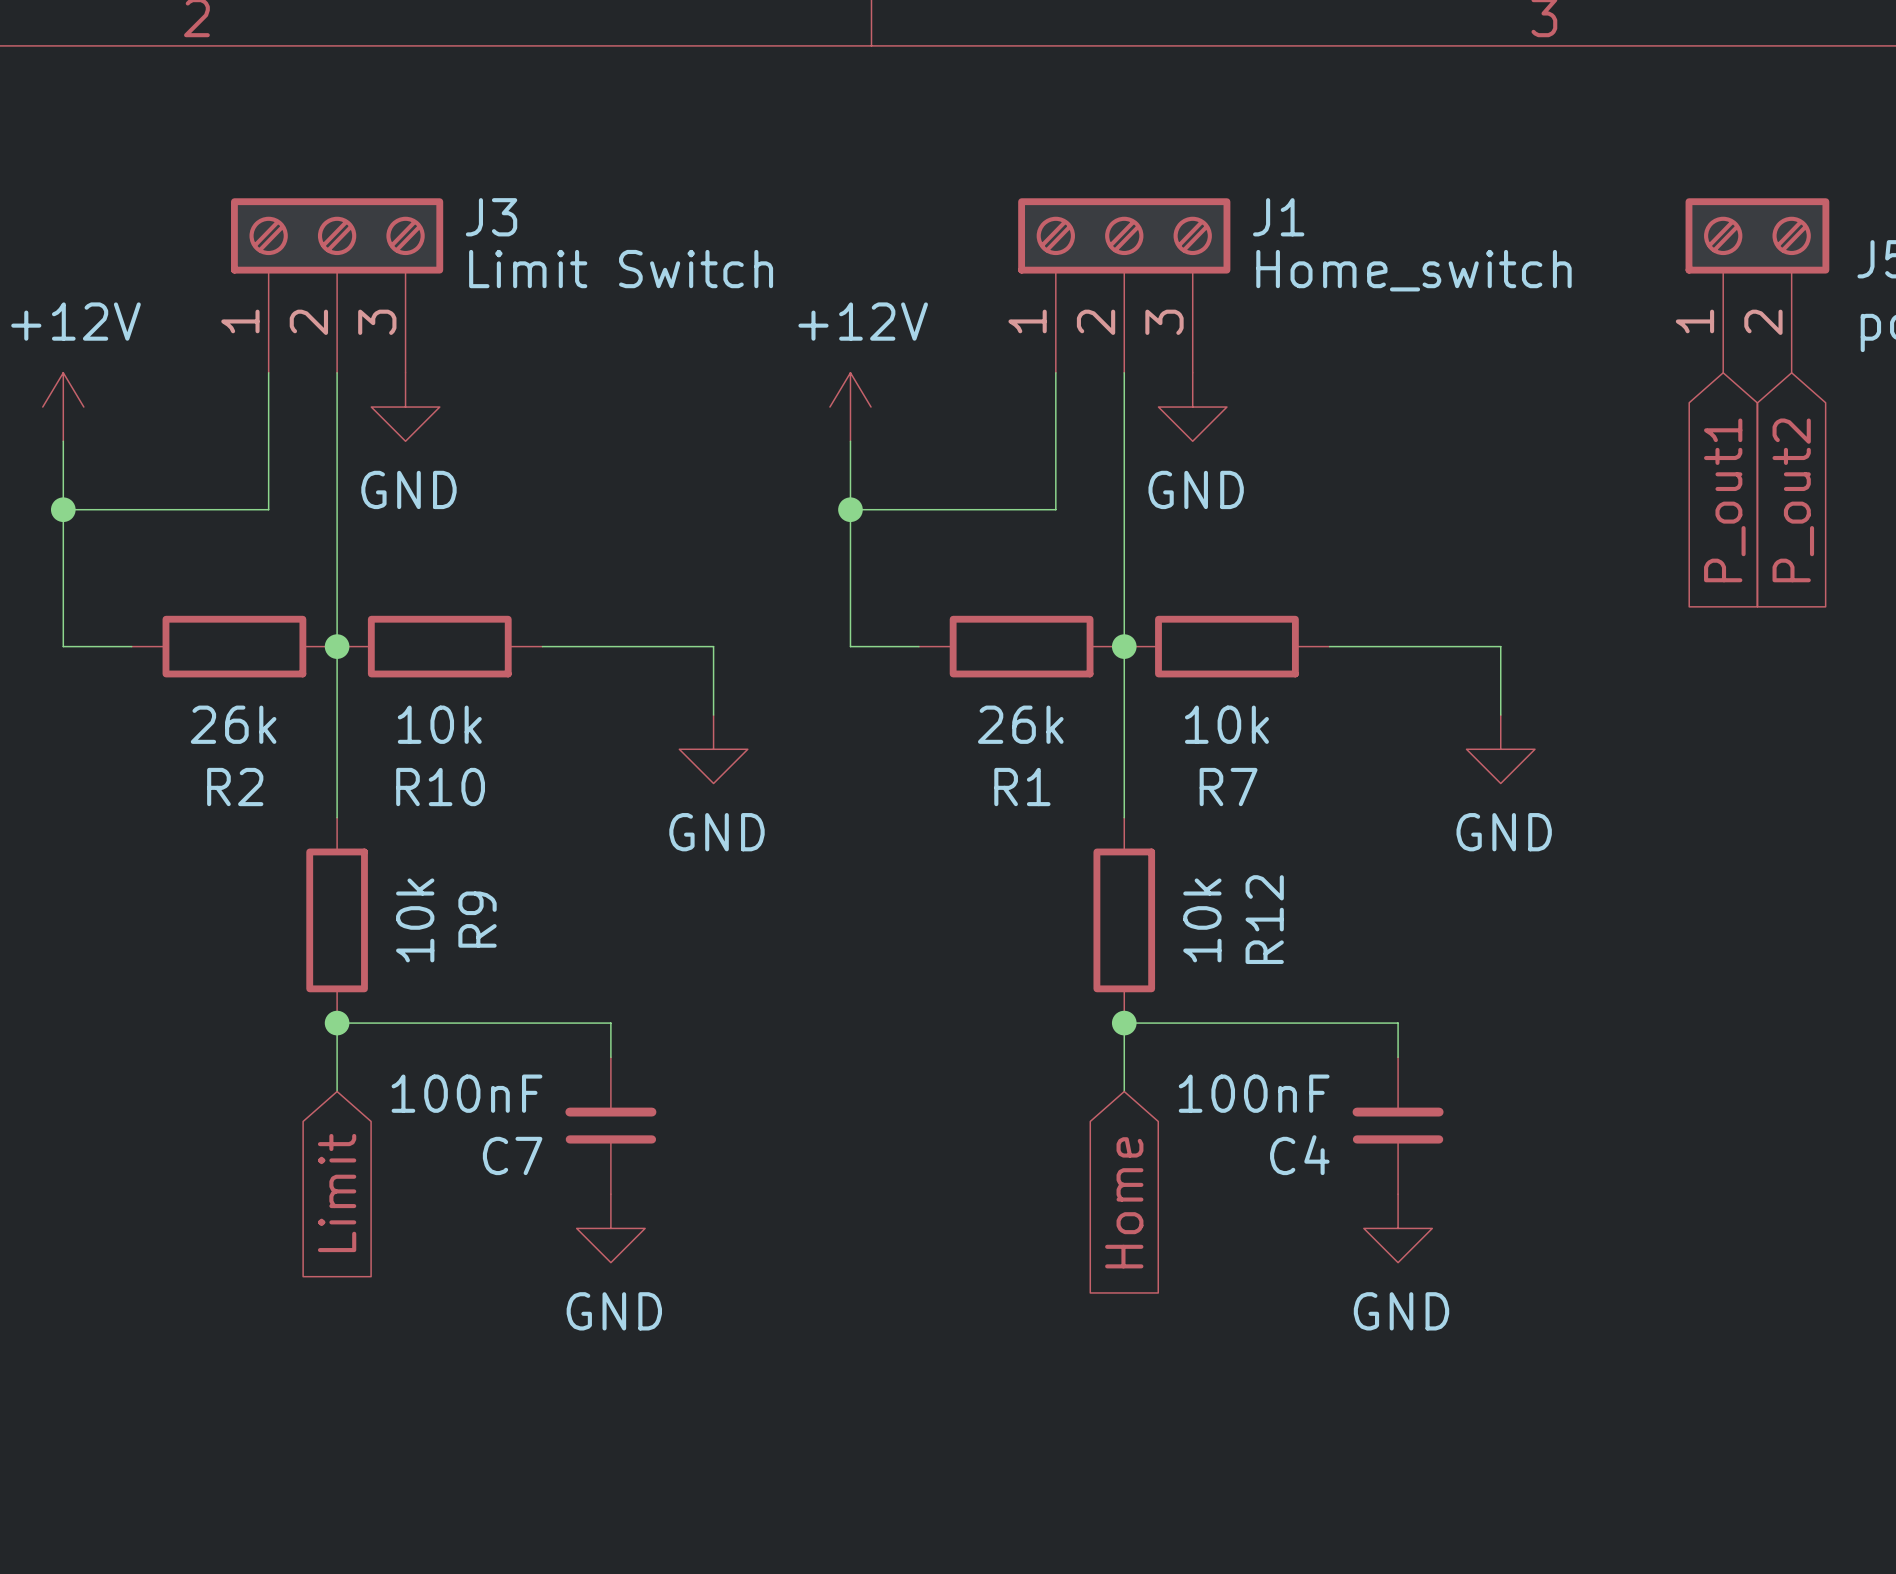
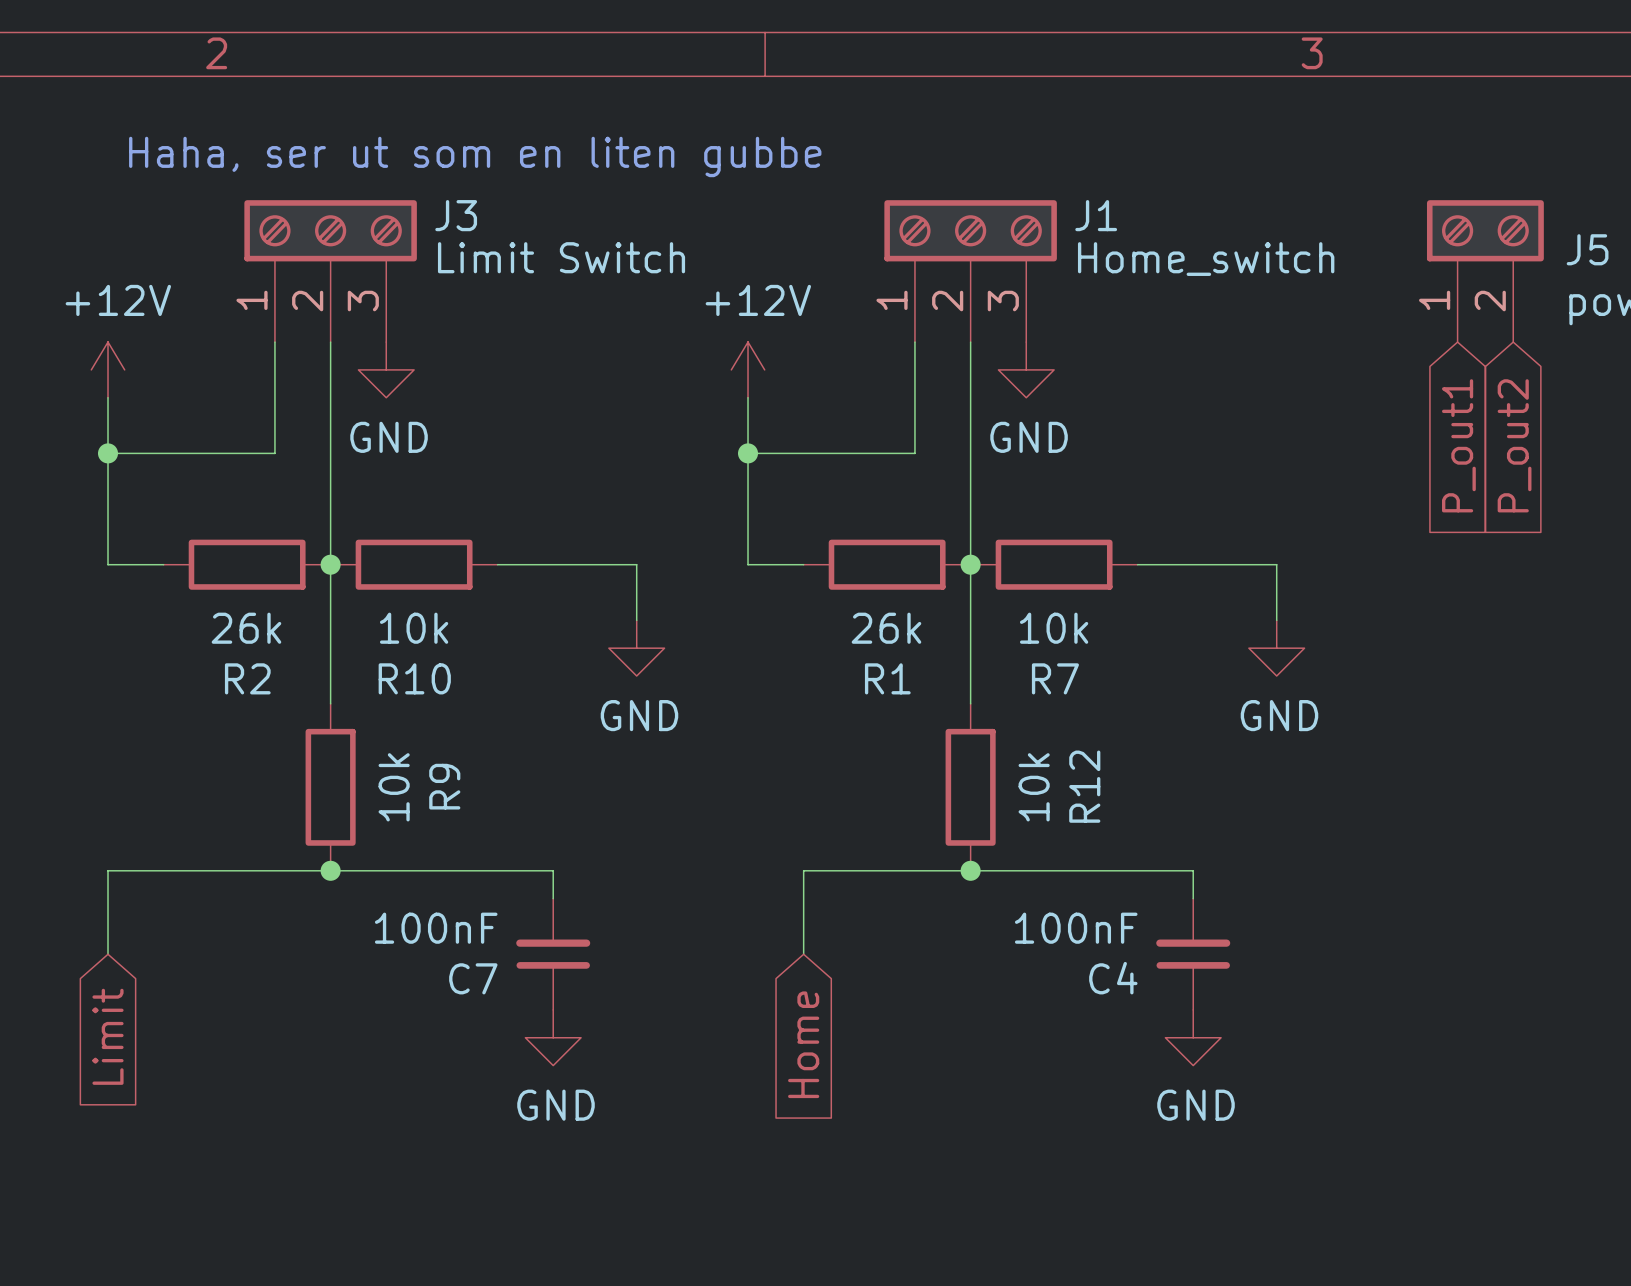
text: none -> Haha, ser ut som en liten gubbe (475, 156)
wire: (337, 1023) (337, 1091) -> (330, 870) (108, 870) (108, 954)
wire: (1124, 1023) (1124, 1091) -> (970, 870) (803, 870) (803, 954)
global label position: Limit (337, 1193) -> Limit (108, 1036)
global label position: Home (1124, 1202) -> Home (803, 1044)

